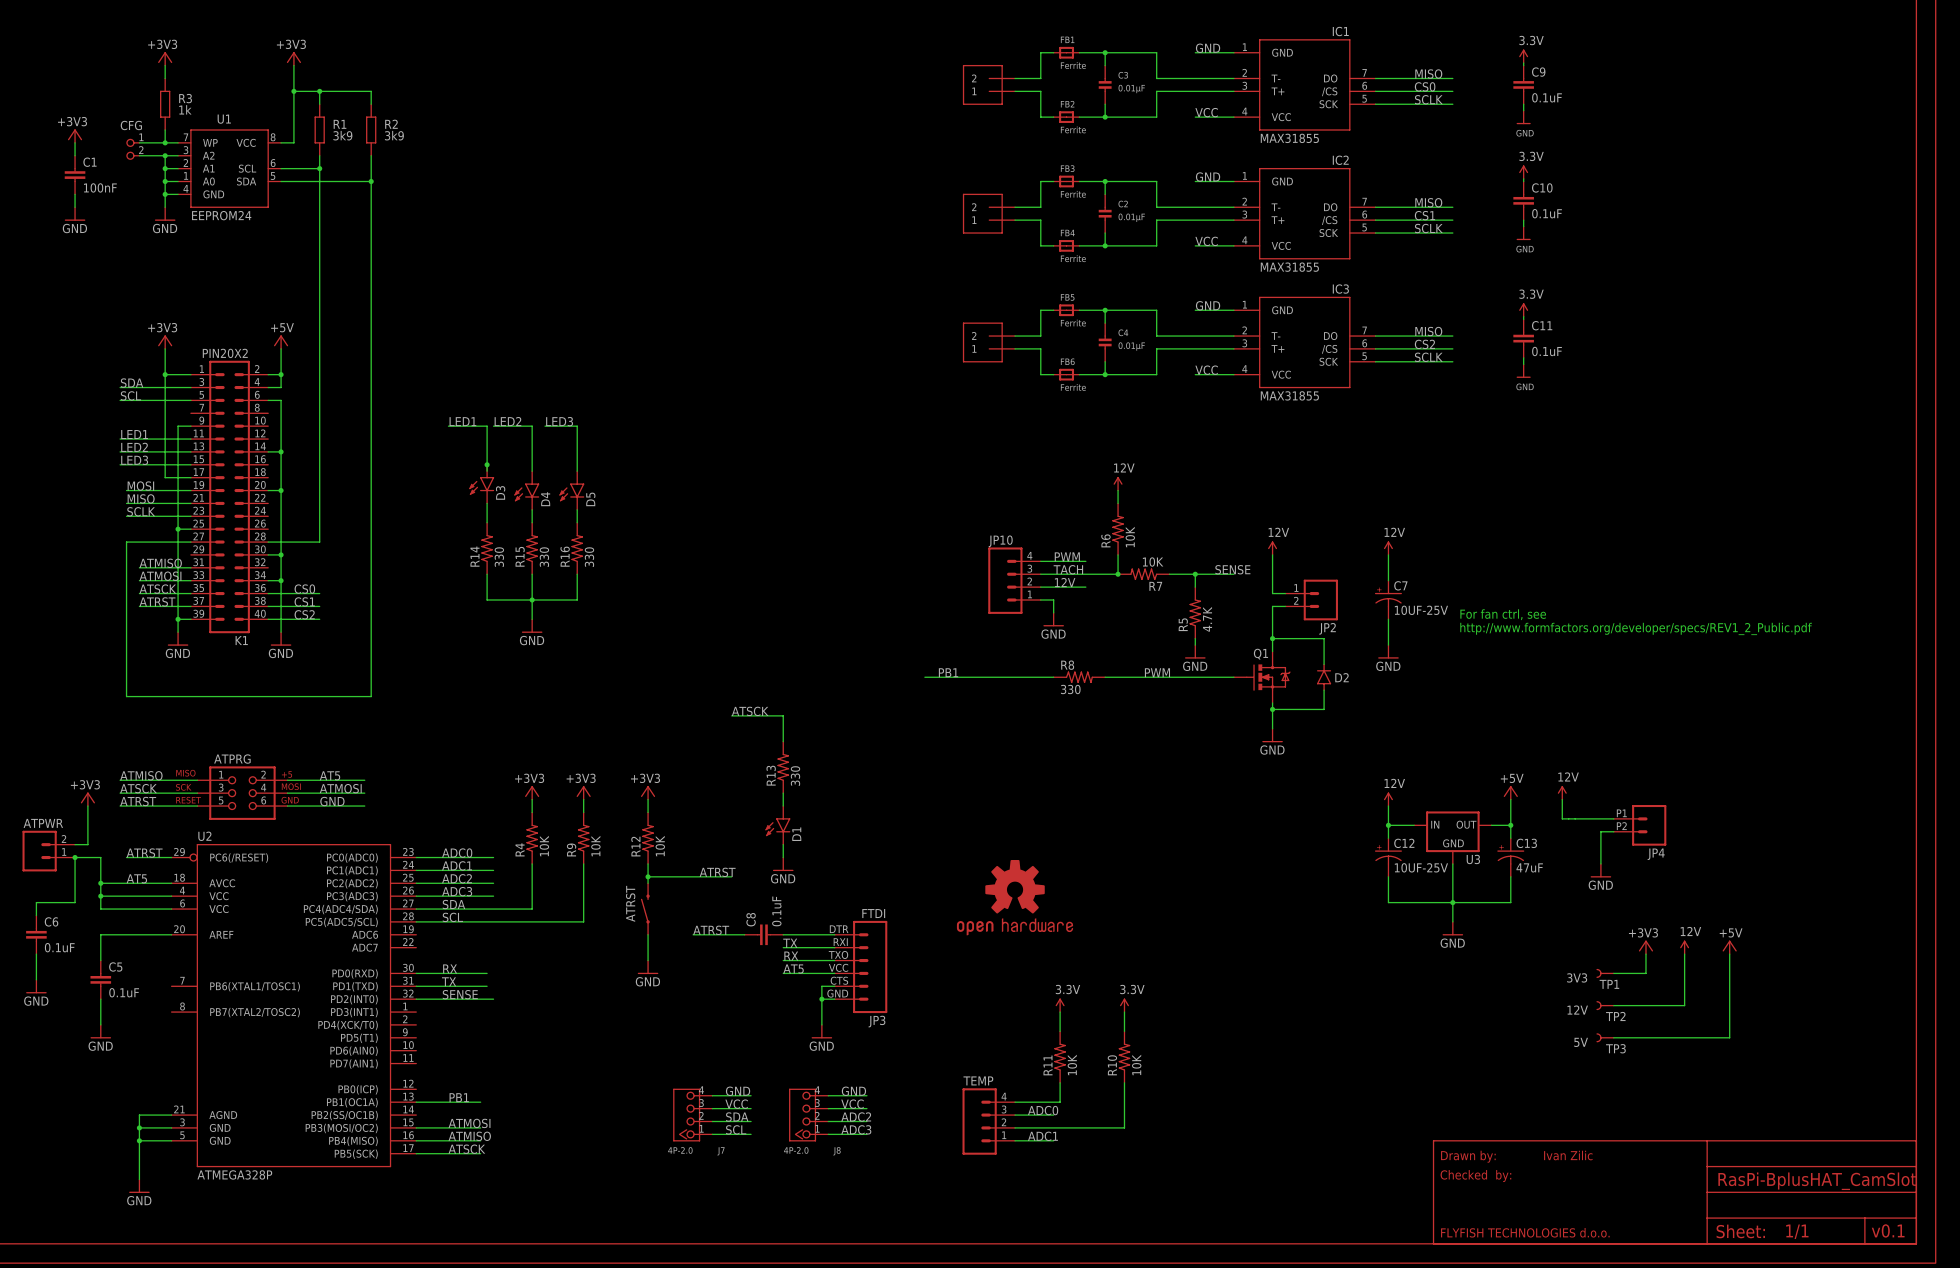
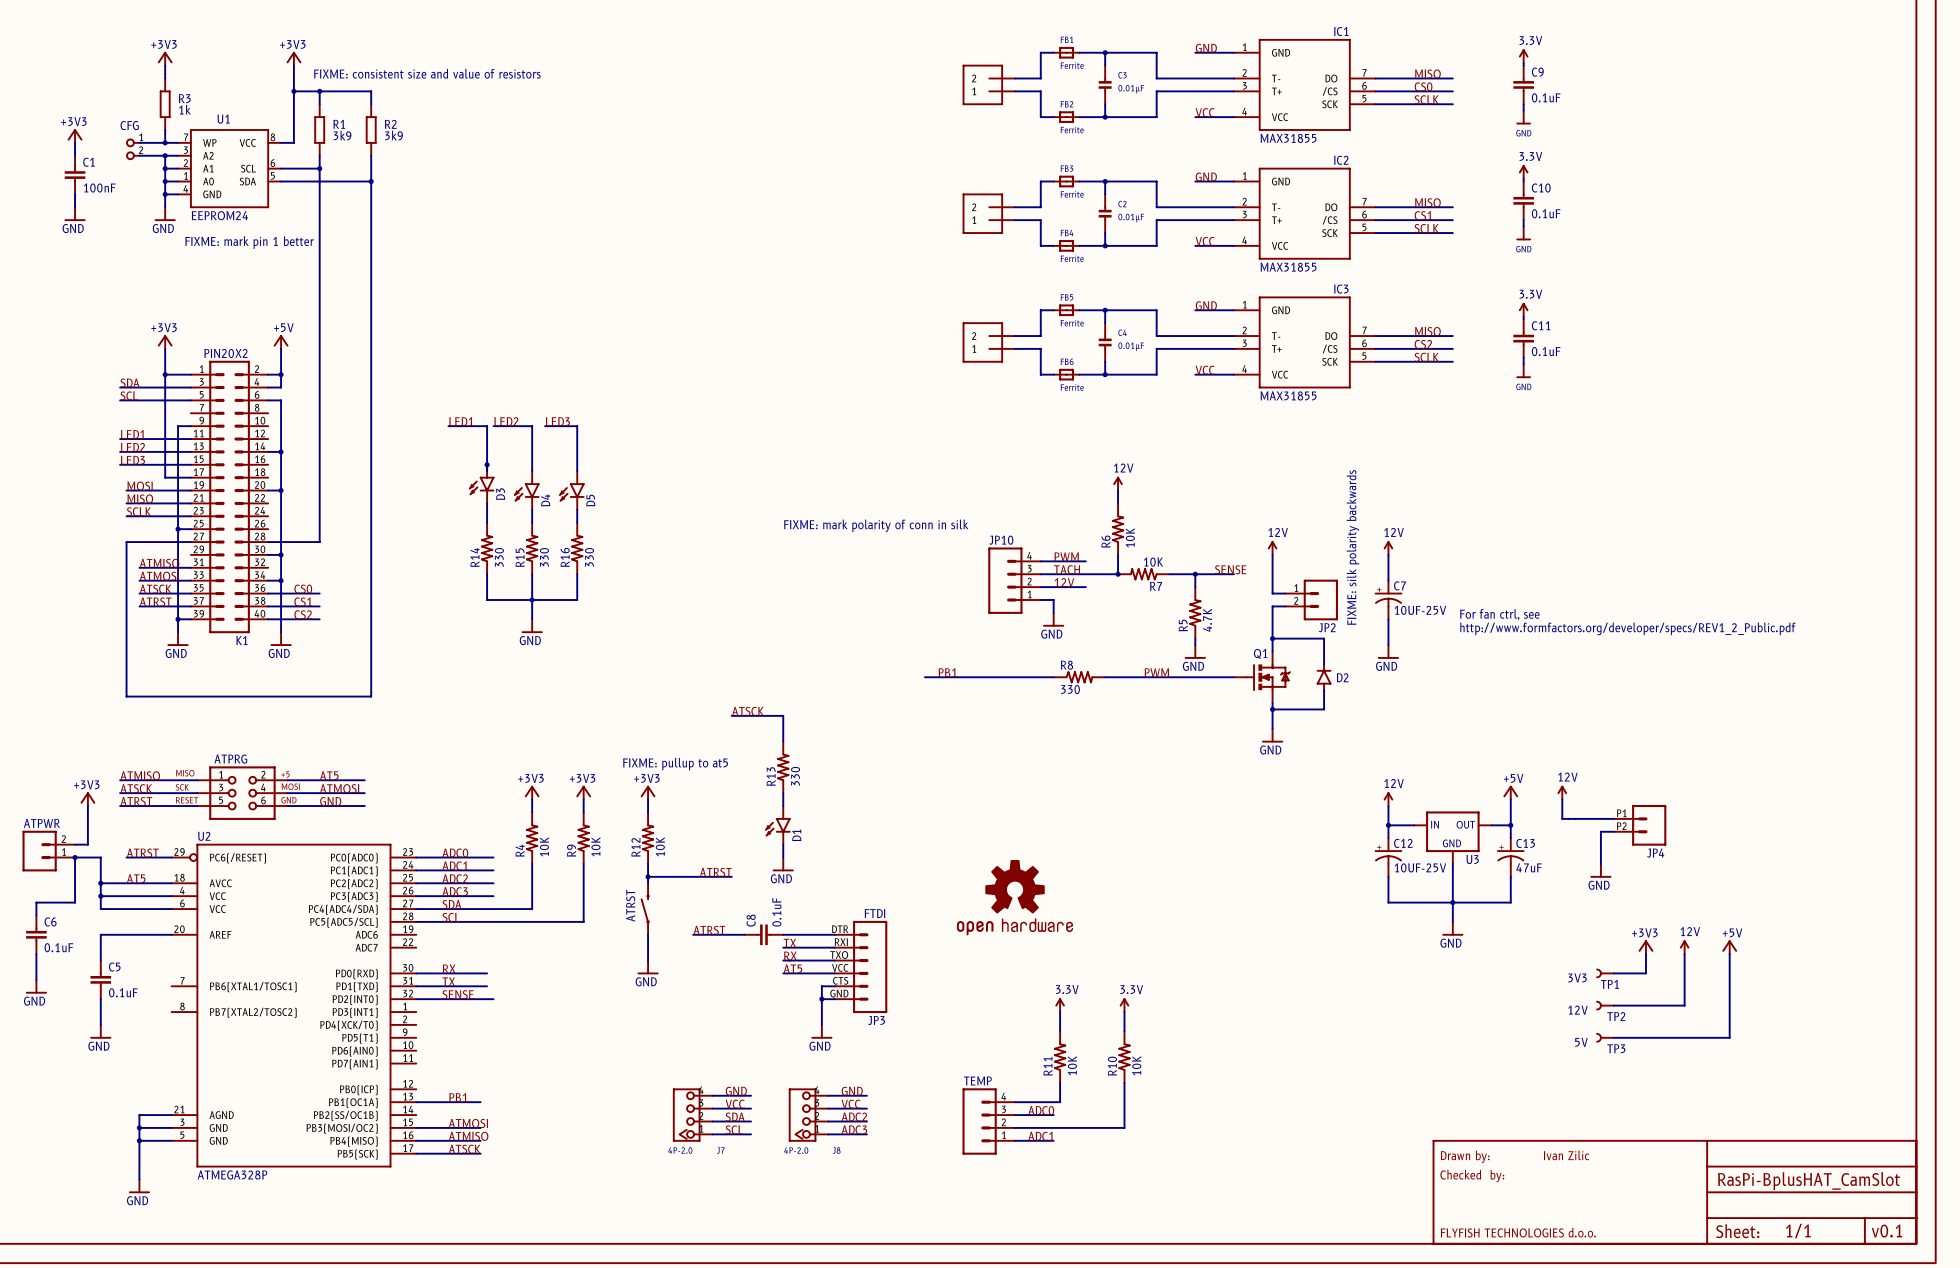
text: none -> FIXME: consistent size and value of resistors (427, 73)
text: none -> FIXME: mark pin 1 better (249, 242)
text: none -> FIXME: mark polarity of conn in silk (876, 525)
text: none -> FIXME: silk polarity backwards (1352, 547)
text: none -> FIXME: pullup to at5 (675, 764)

